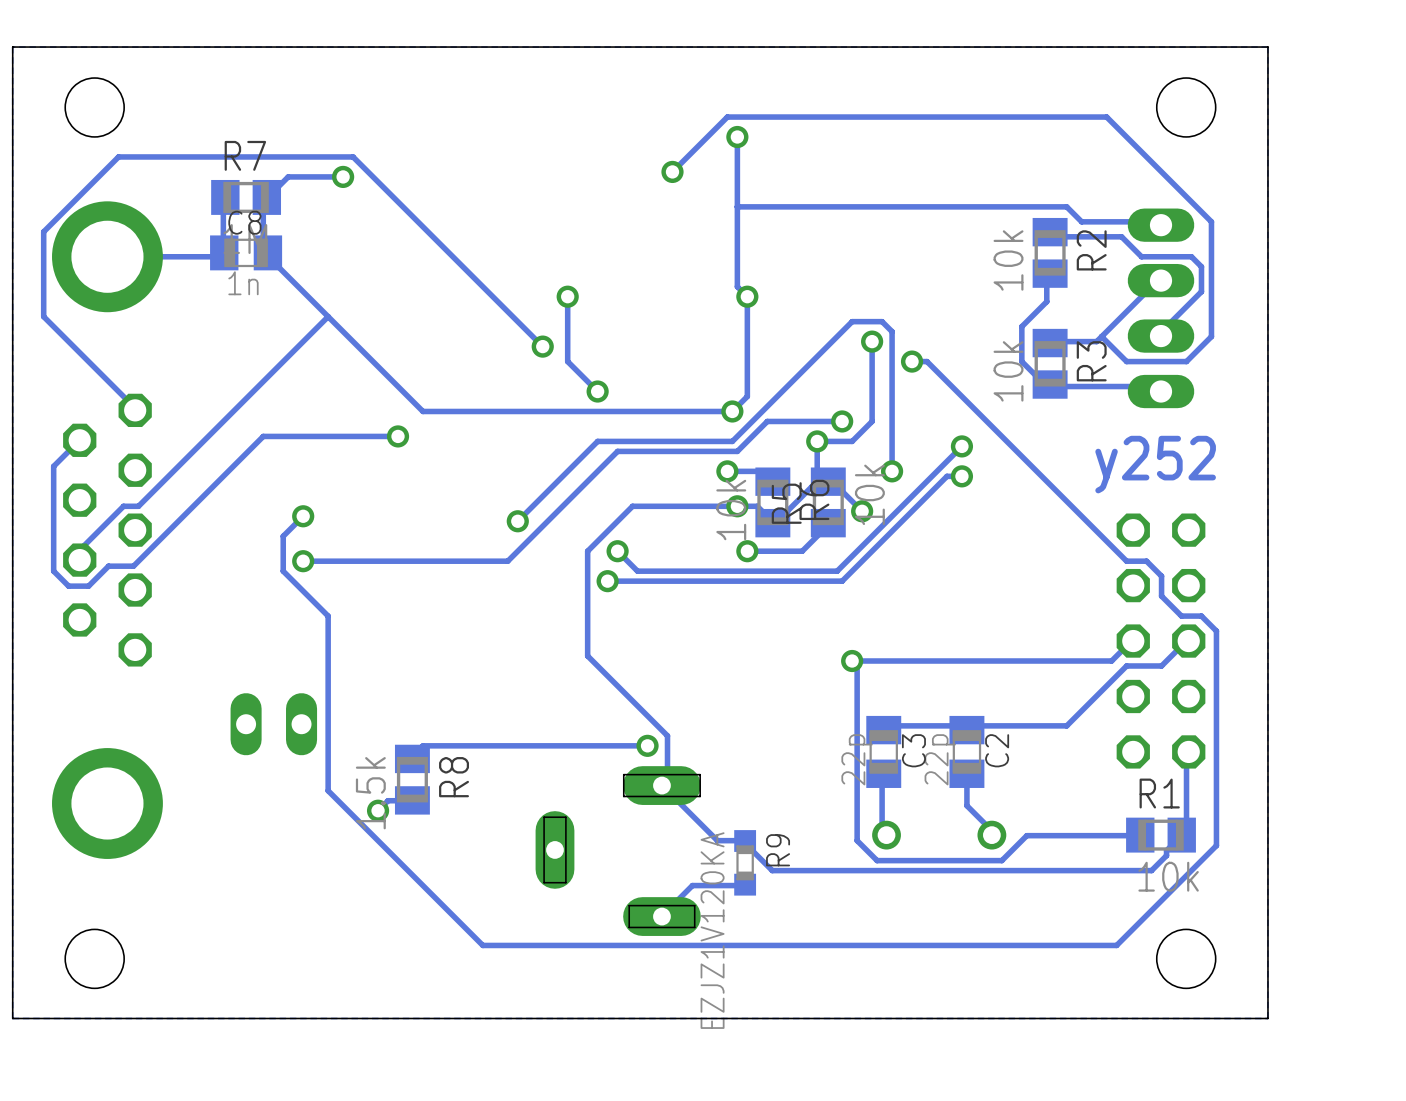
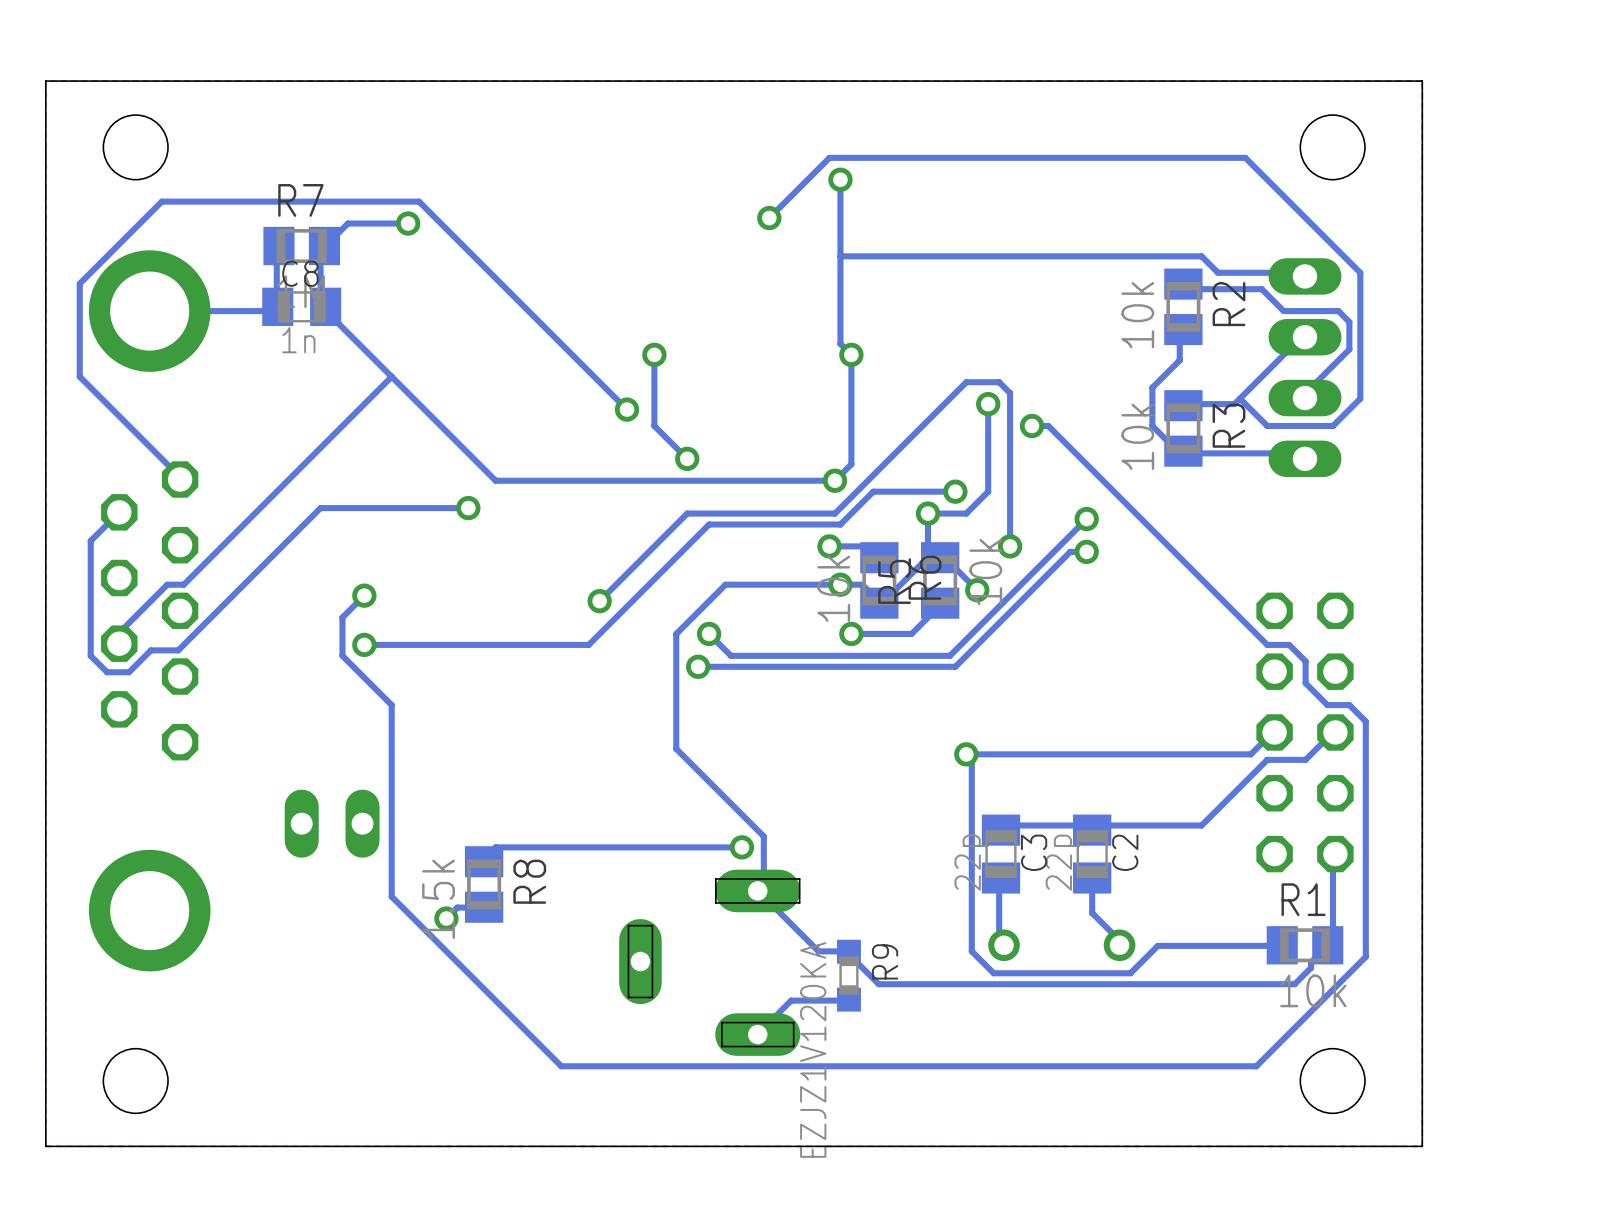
text: y252 (1155, 464) -> none

